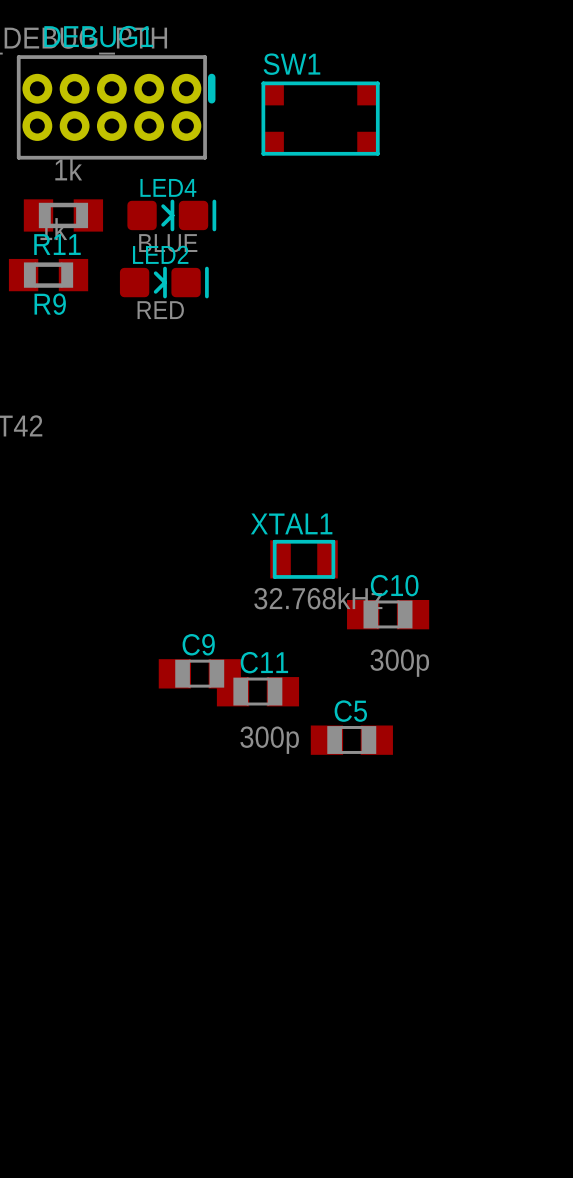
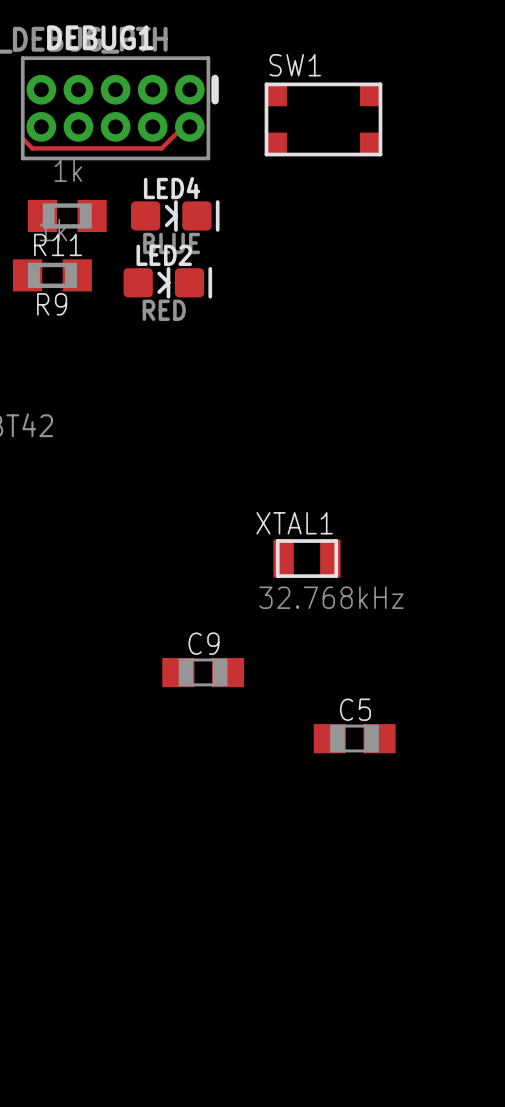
top track: none -> (189, 126) (183, 126) (161, 148) (32, 148) (22, 138)
C10: 300p (388, 614) -> none
C11: 300p (257, 691) -> none

